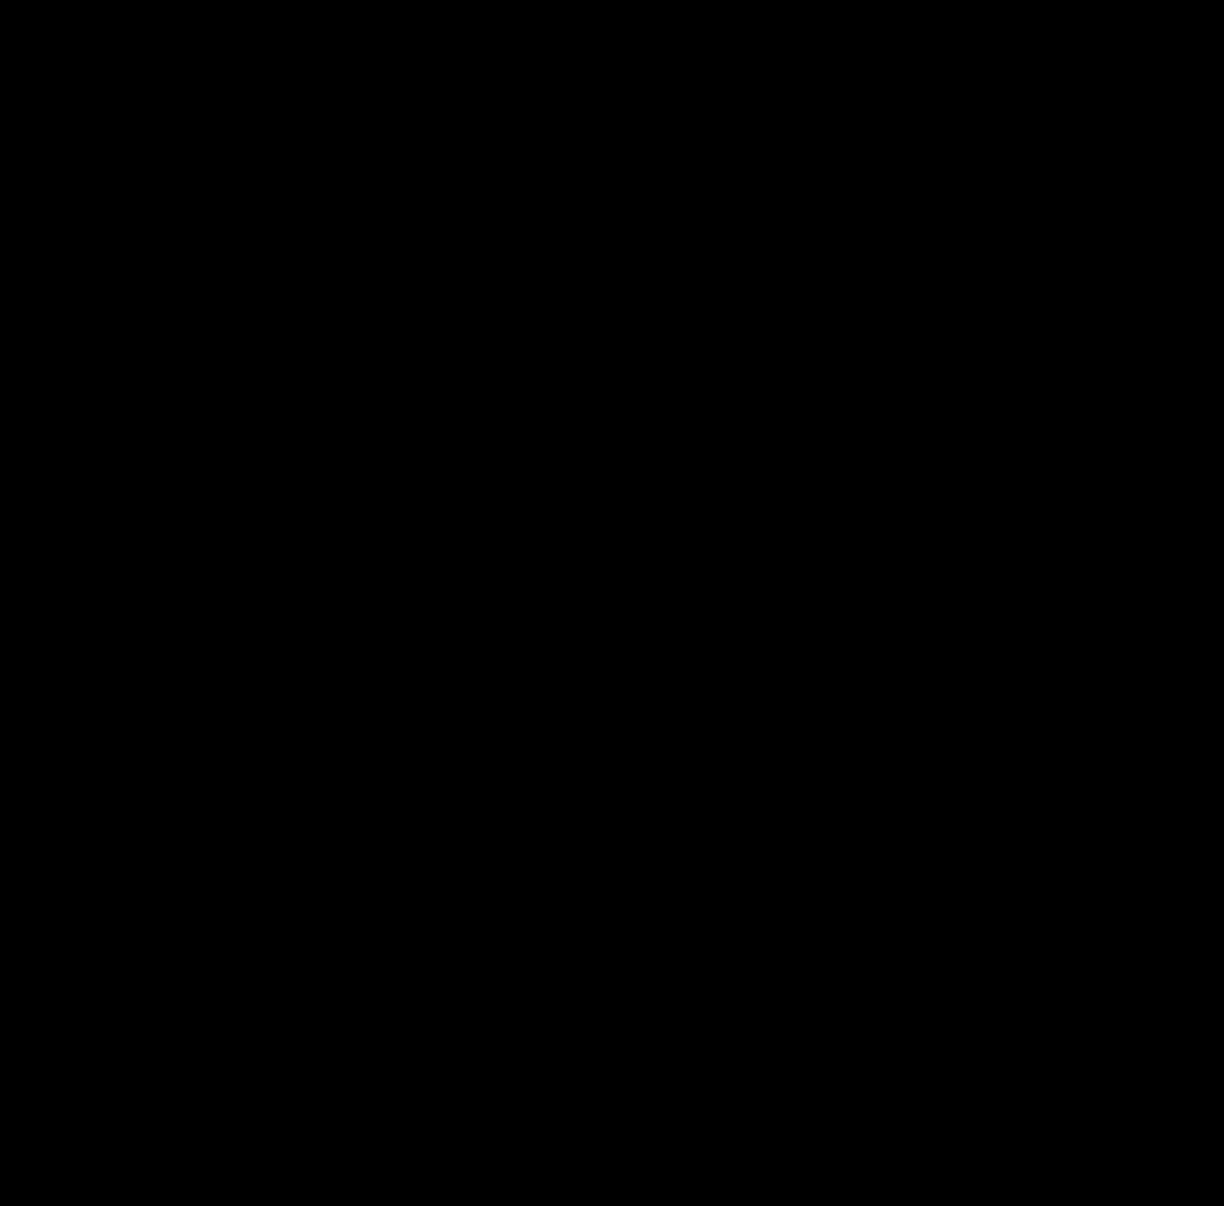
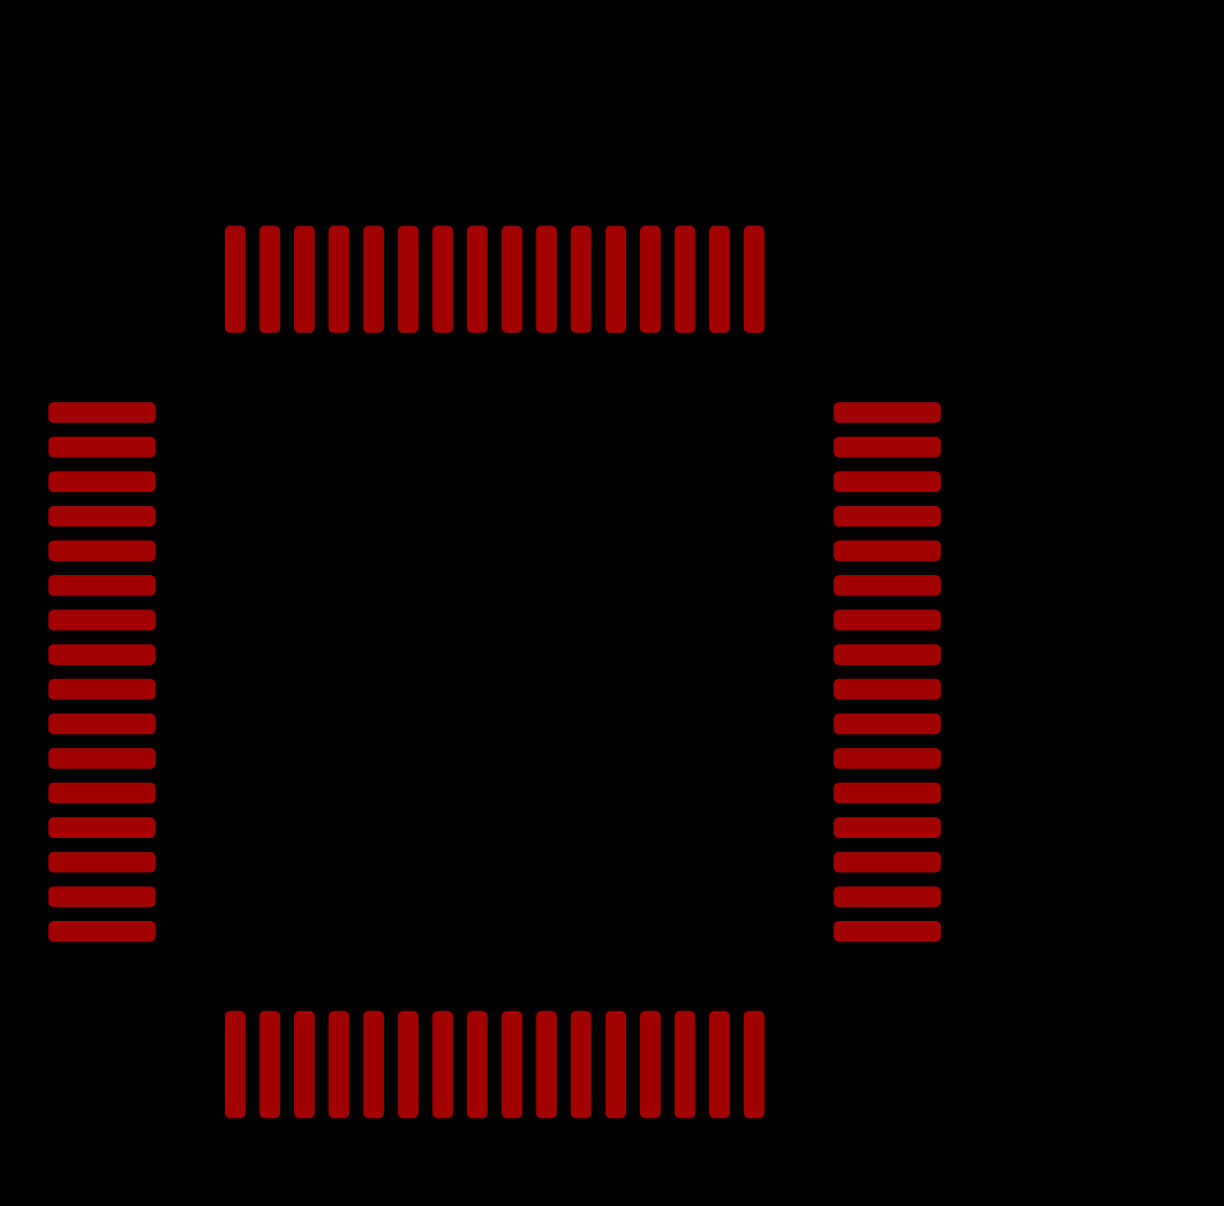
part: none -> (494, 671)

